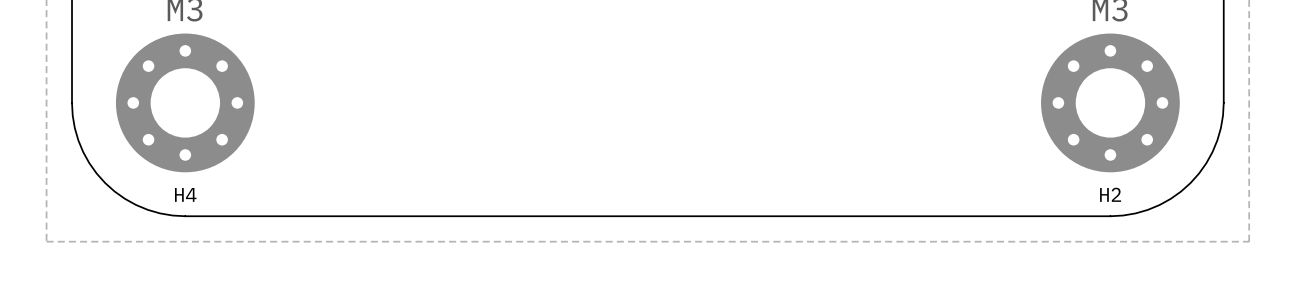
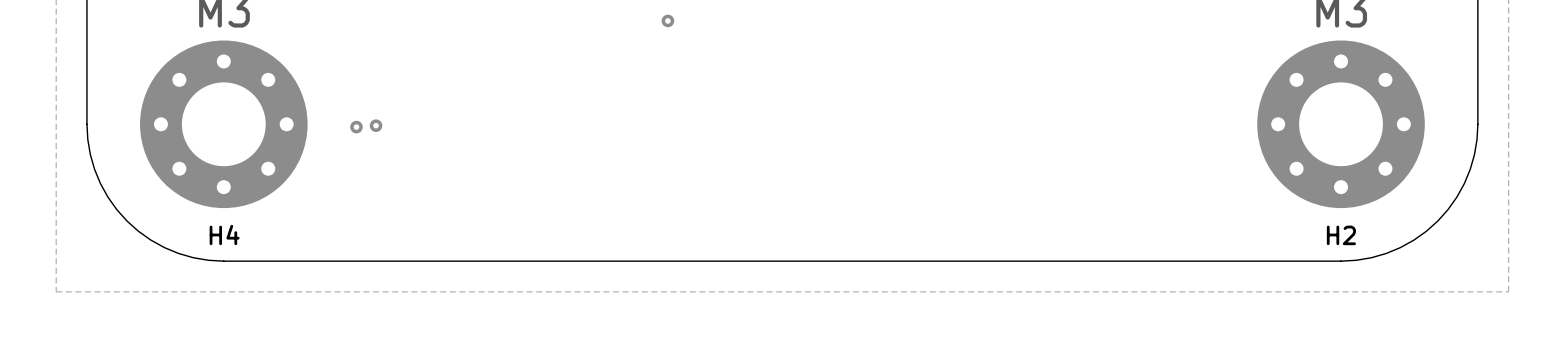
via: none -> (667, 20)
via: none -> (376, 125)
via: none -> (356, 127)

